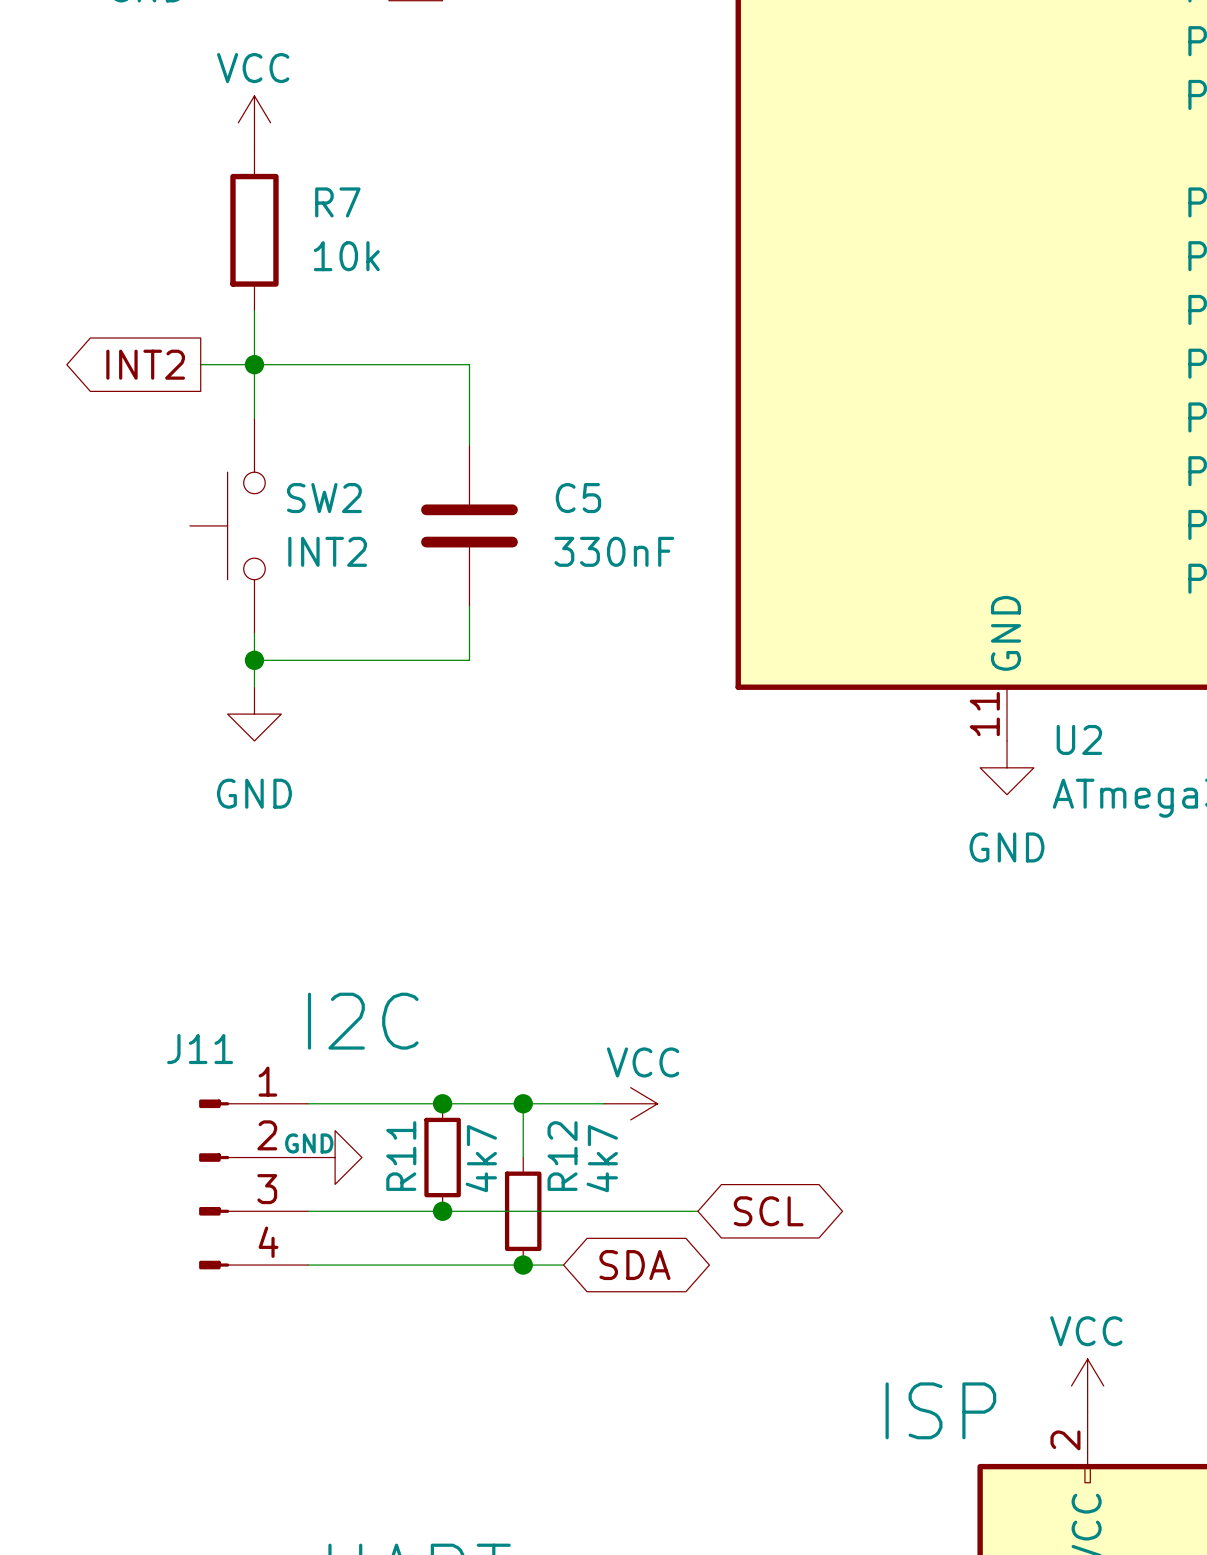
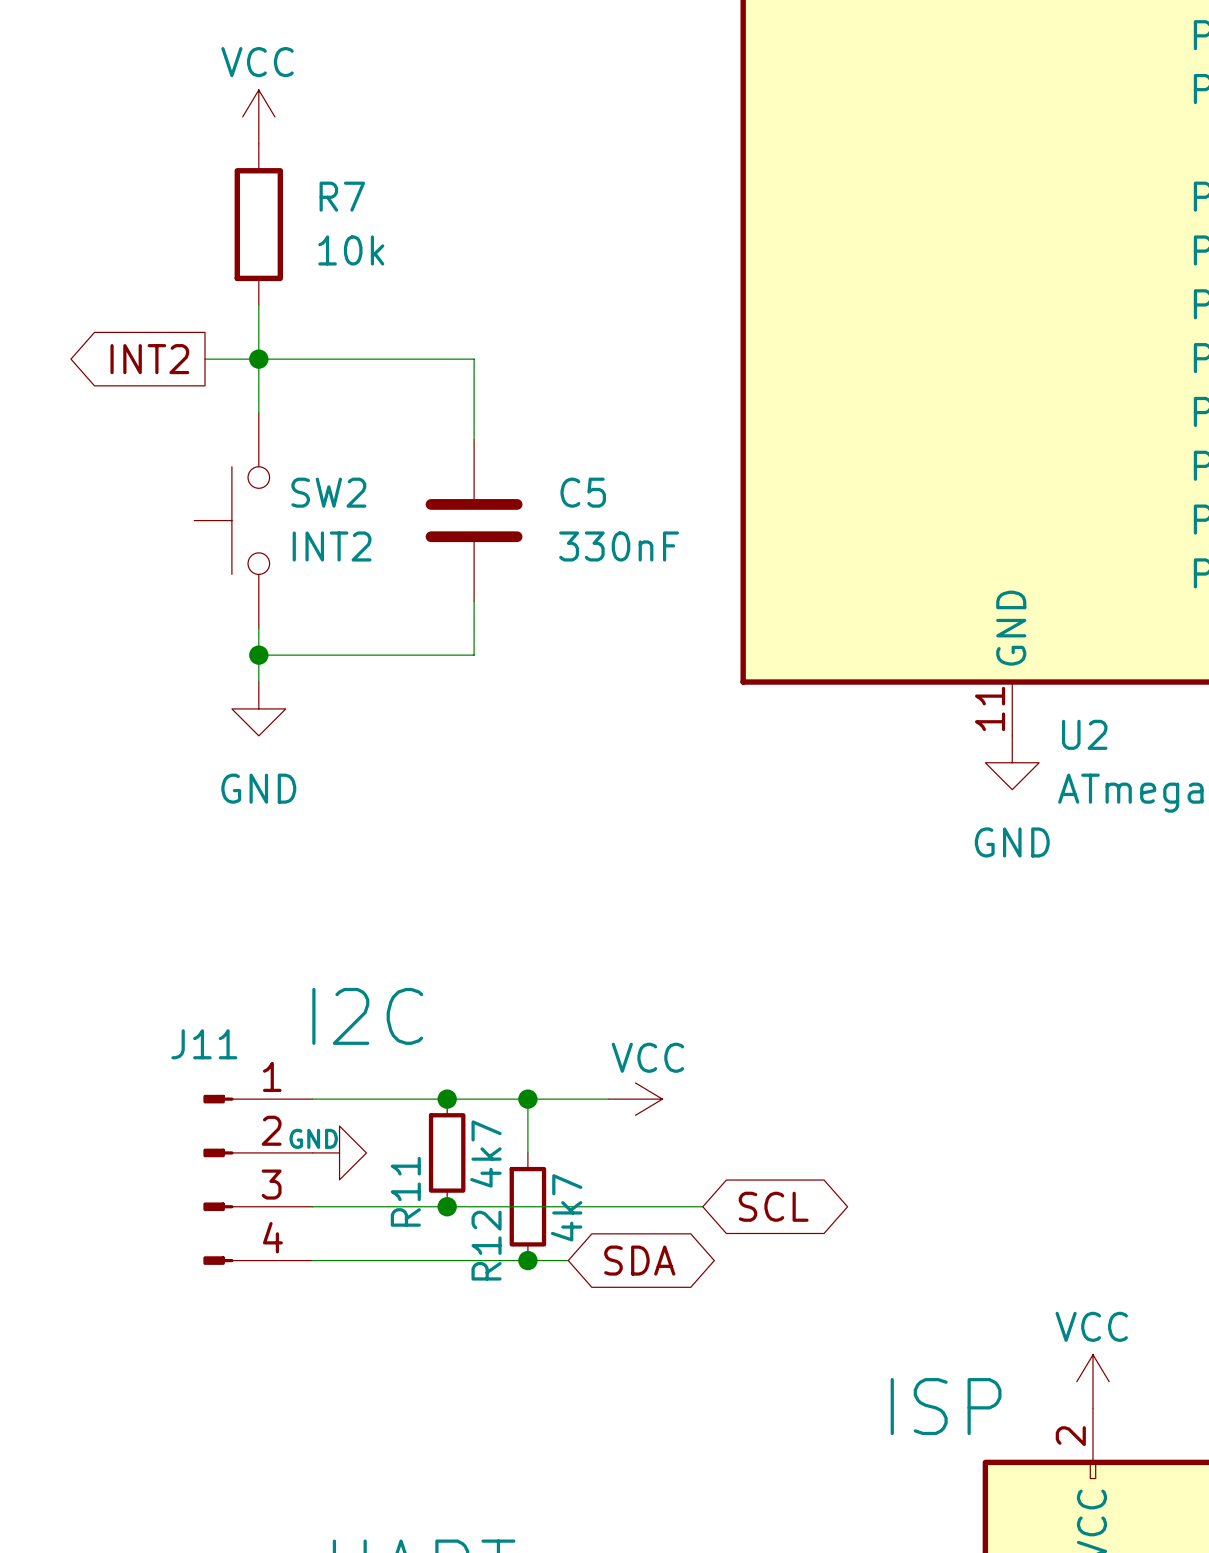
R11 name position: R11 (401, 1156) -> R11 (405, 1191)
R12 name position: R12 (562, 1156) -> R12 (486, 1245)
R12 value position: 4k7 (602, 1158) -> 4k7 (566, 1207)

